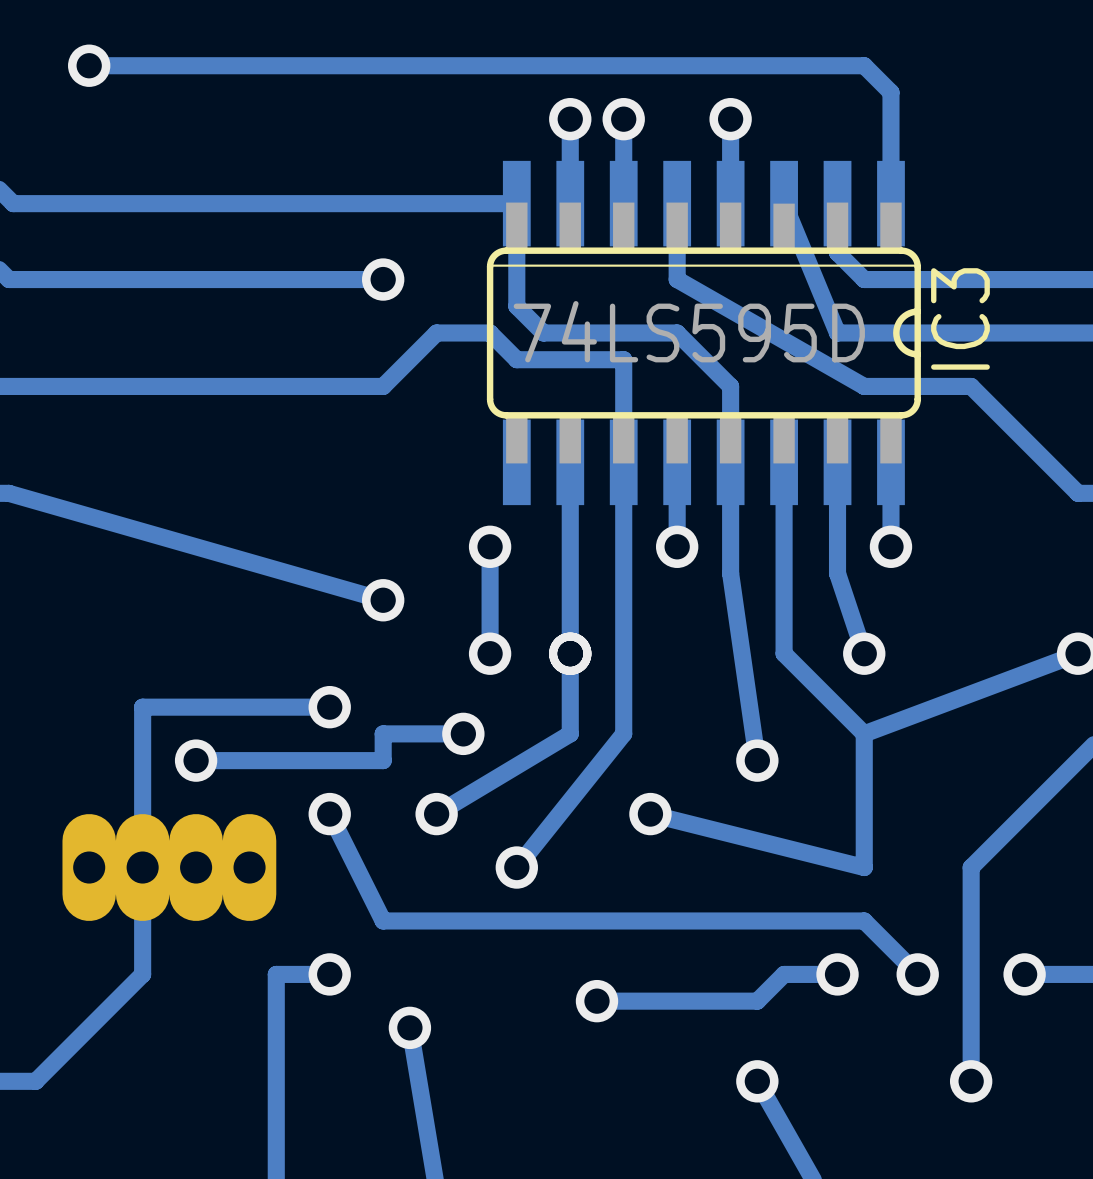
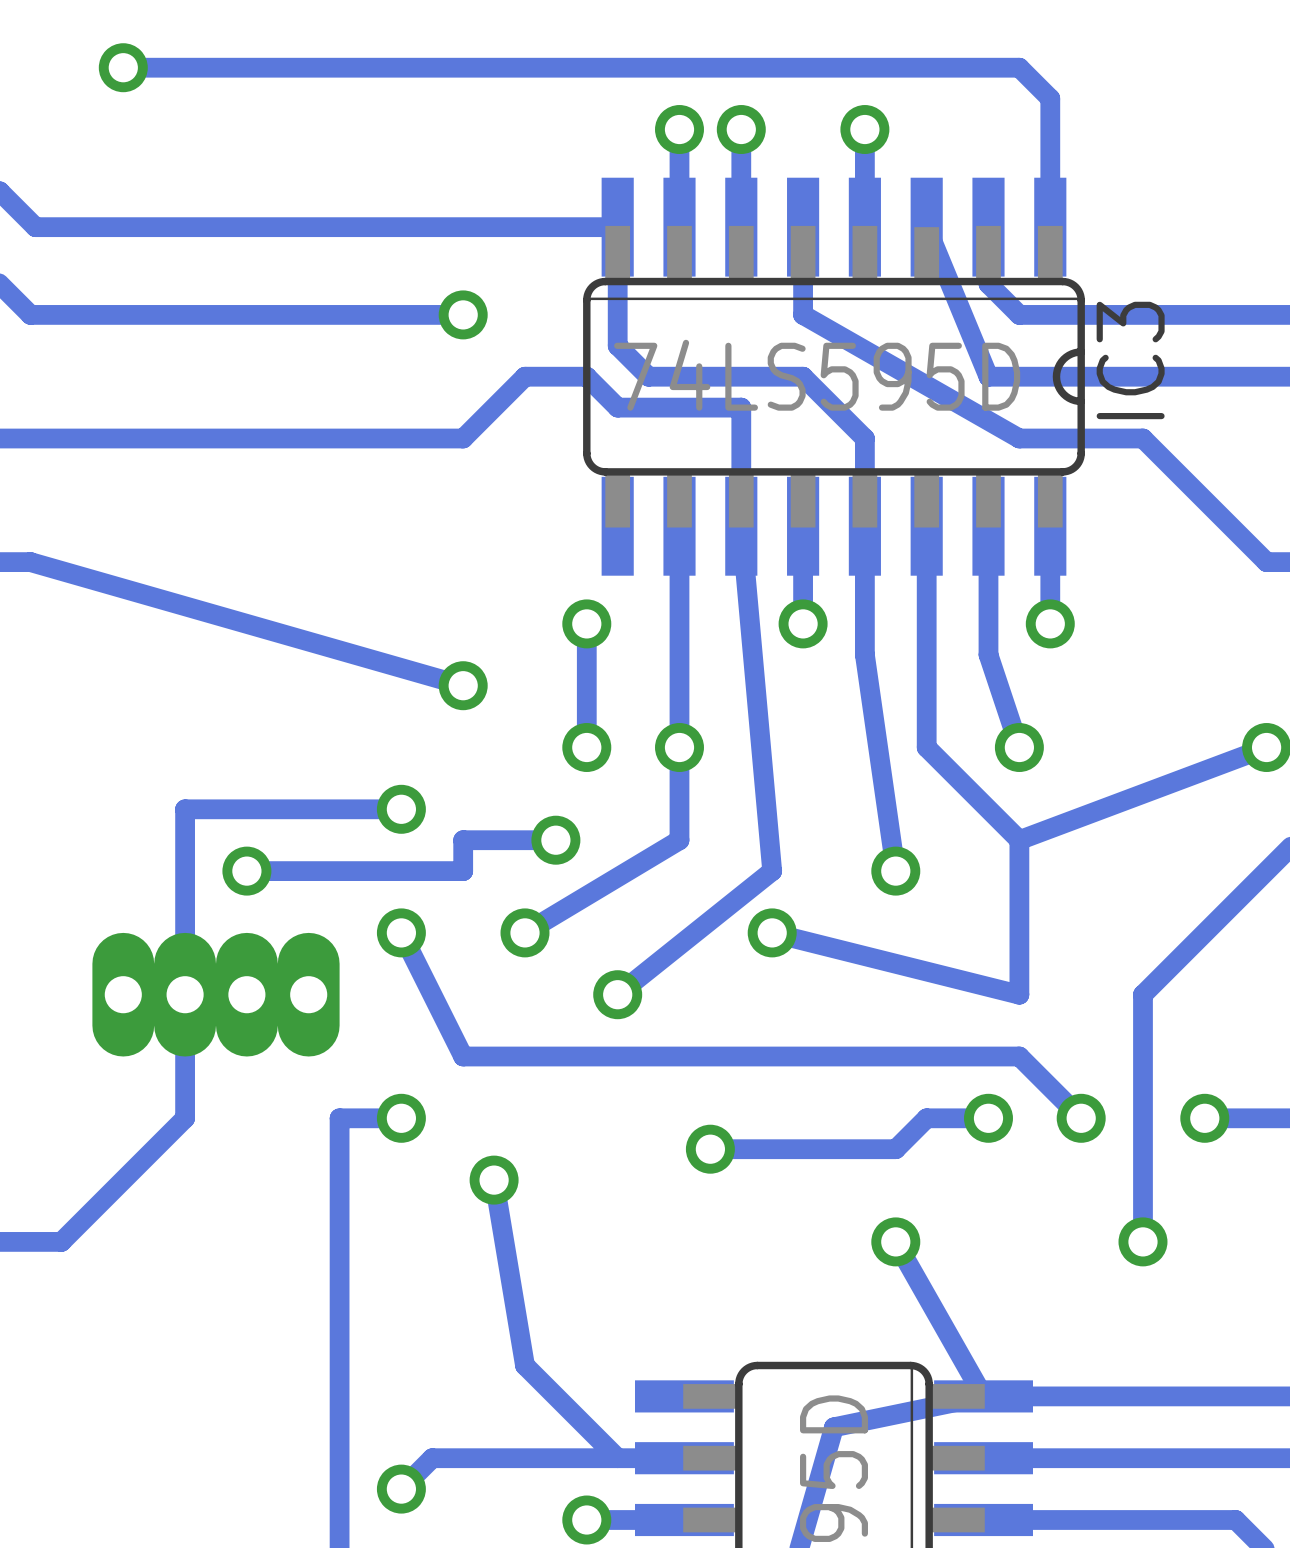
track: (623, 462) (623, 733) (516, 867) -> (741, 526) (772, 871) (617, 994)

